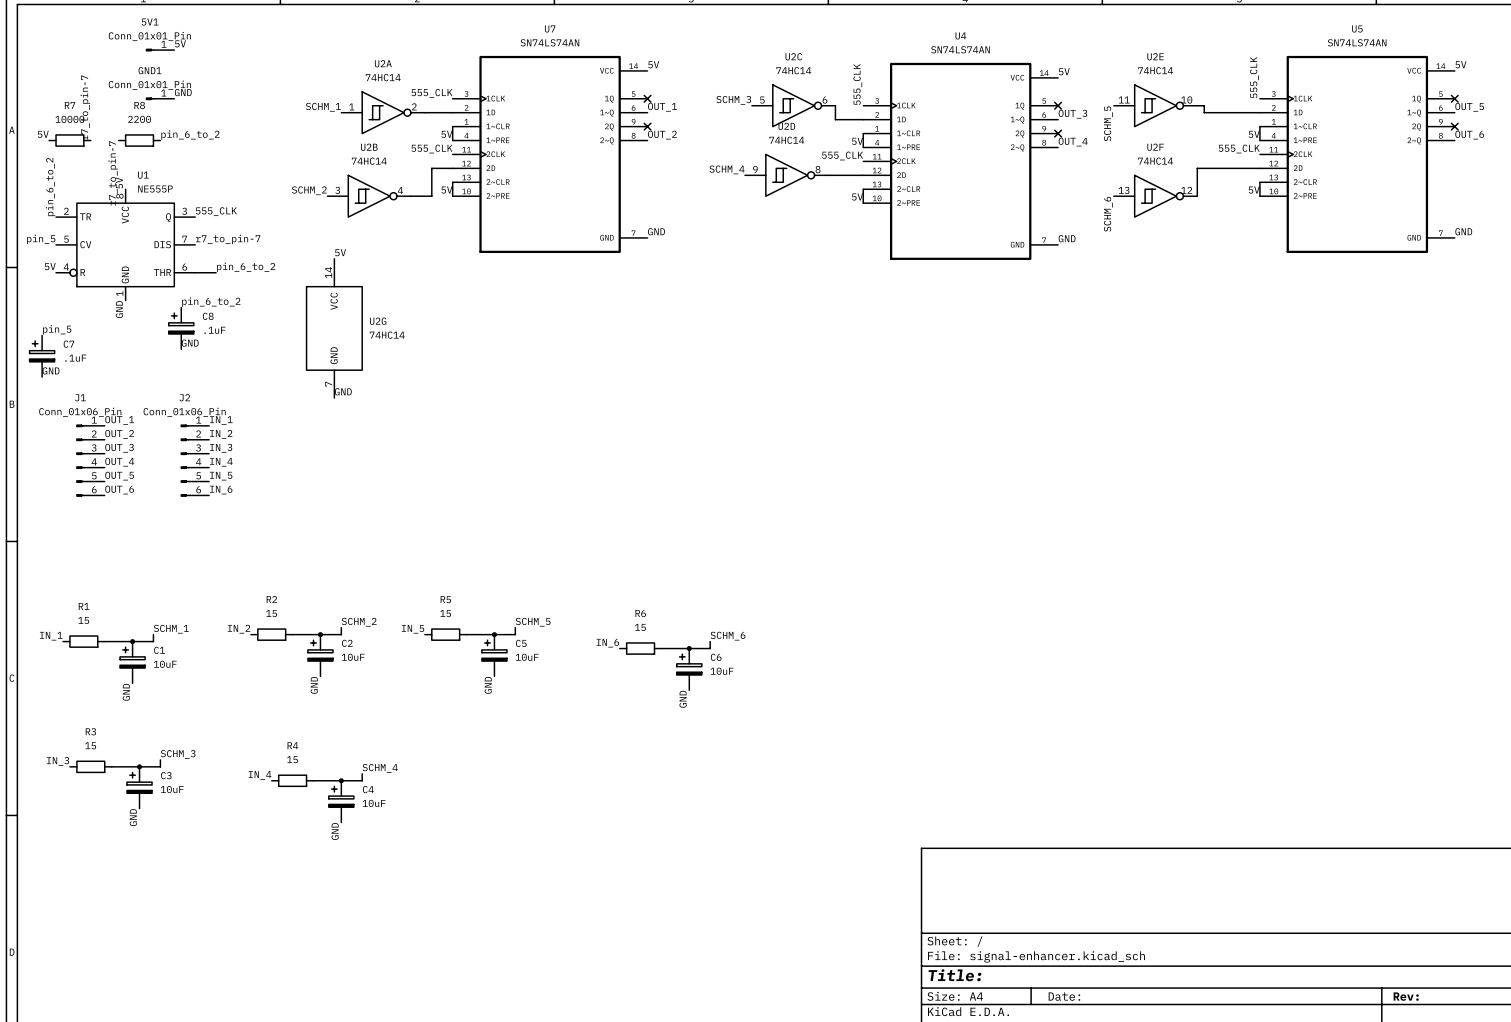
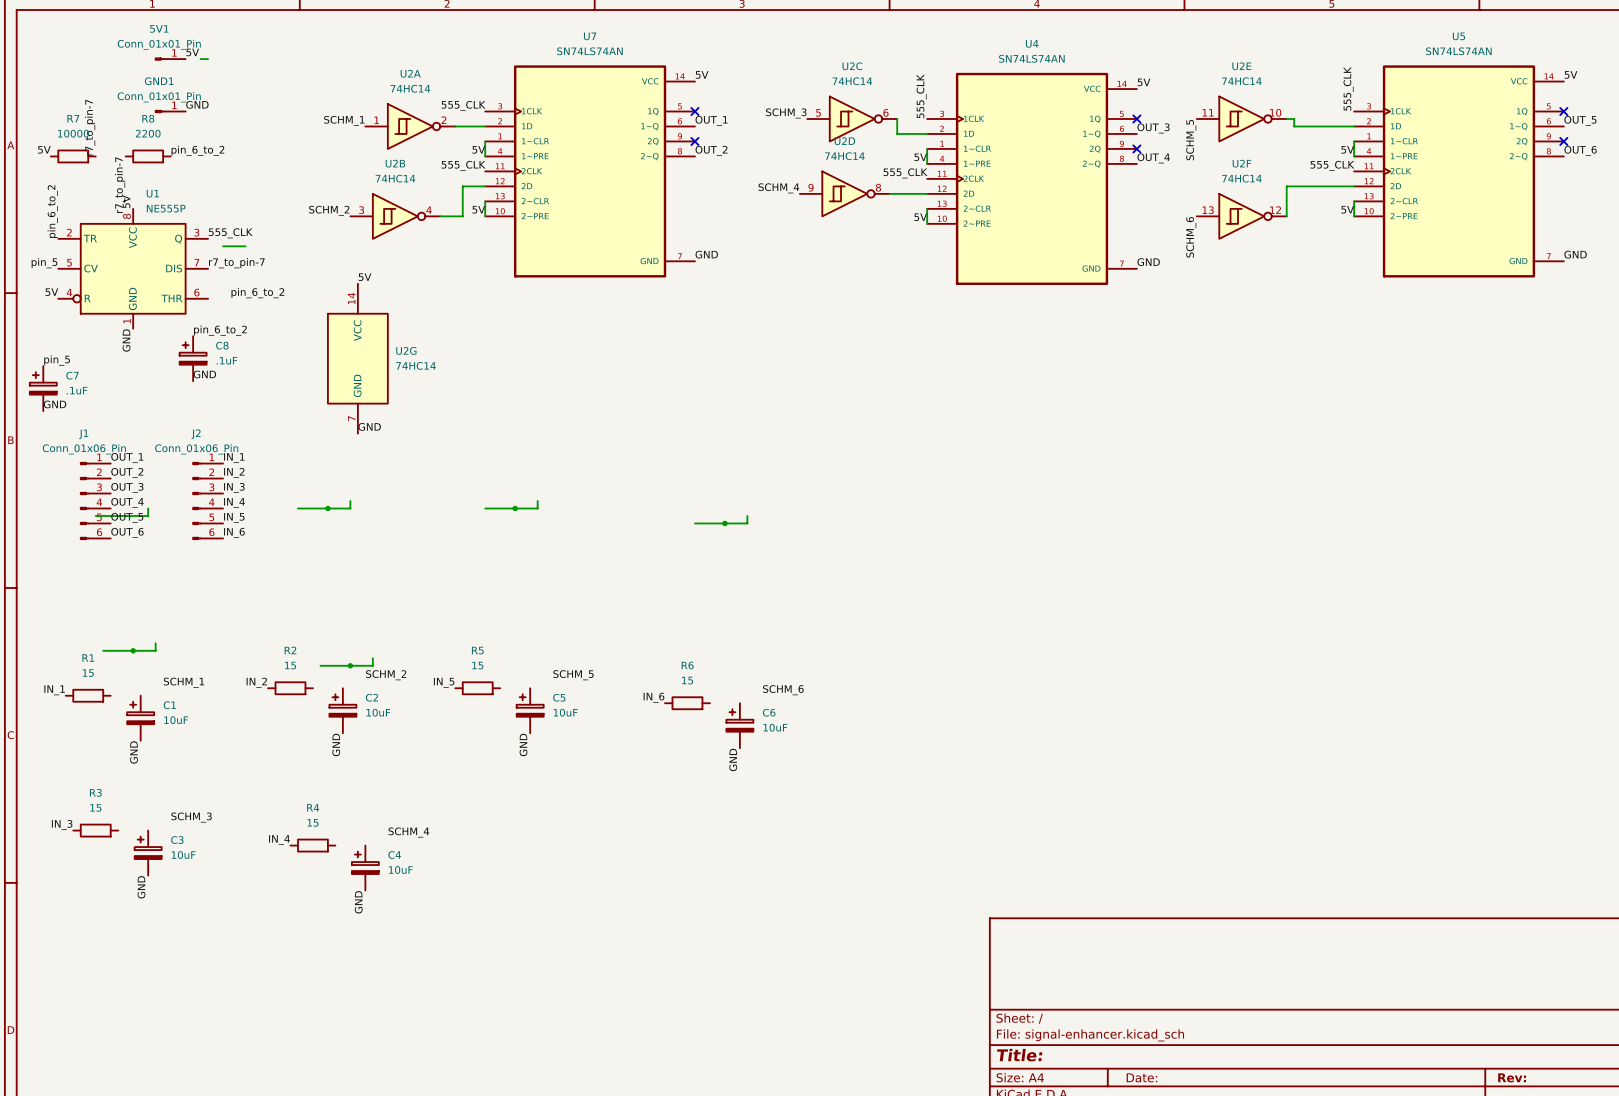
wire: none -> (200, 59) (208, 59)
wire: (195, 272) (216, 272) -> (223, 246) (245, 246)
wire: none -> (350, 501) (350, 508) (297, 508)
wire: none -> (537, 501) (537, 508) (485, 508)
wire: none -> (148, 508) (148, 515) (95, 515)
junction: none -> (327, 508)
junction: none -> (515, 508)
wire: none -> (747, 515) (747, 523) (694, 523)
junction: none -> (724, 523)
junction: none -> (133, 650)
wire: (341, 627) (341, 634) (292, 634) -> (372, 658) (372, 665) (320, 665)
wire: (515, 627) (515, 634) (466, 634) -> none
wire: (153, 634) (153, 641) (104, 641) -> (155, 643) (155, 650) (103, 650)
junction position: (320, 634) -> (350, 665)
junction: (494, 634) -> none
junction: (132, 641) -> none
wire: (710, 641) (710, 648) (661, 648) -> none
junction: (689, 648) -> none
wire: (160, 759) (160, 766) (111, 766) -> none
junction: (139, 766) -> none
wire: (362, 773) (362, 780) (313, 780) -> none
junction: (341, 780) -> none

